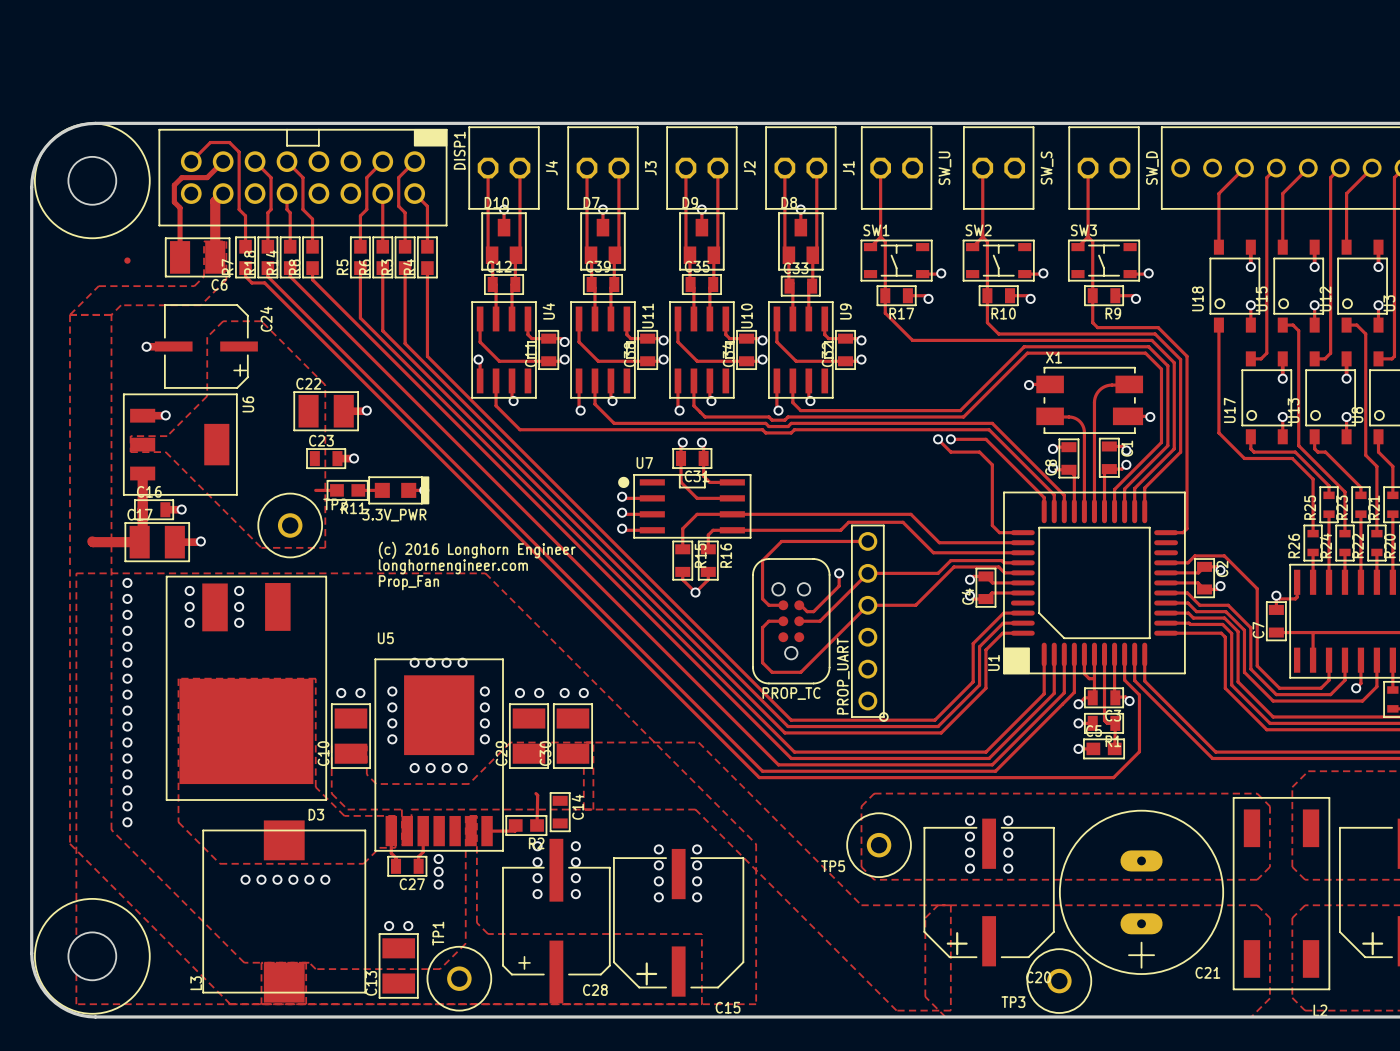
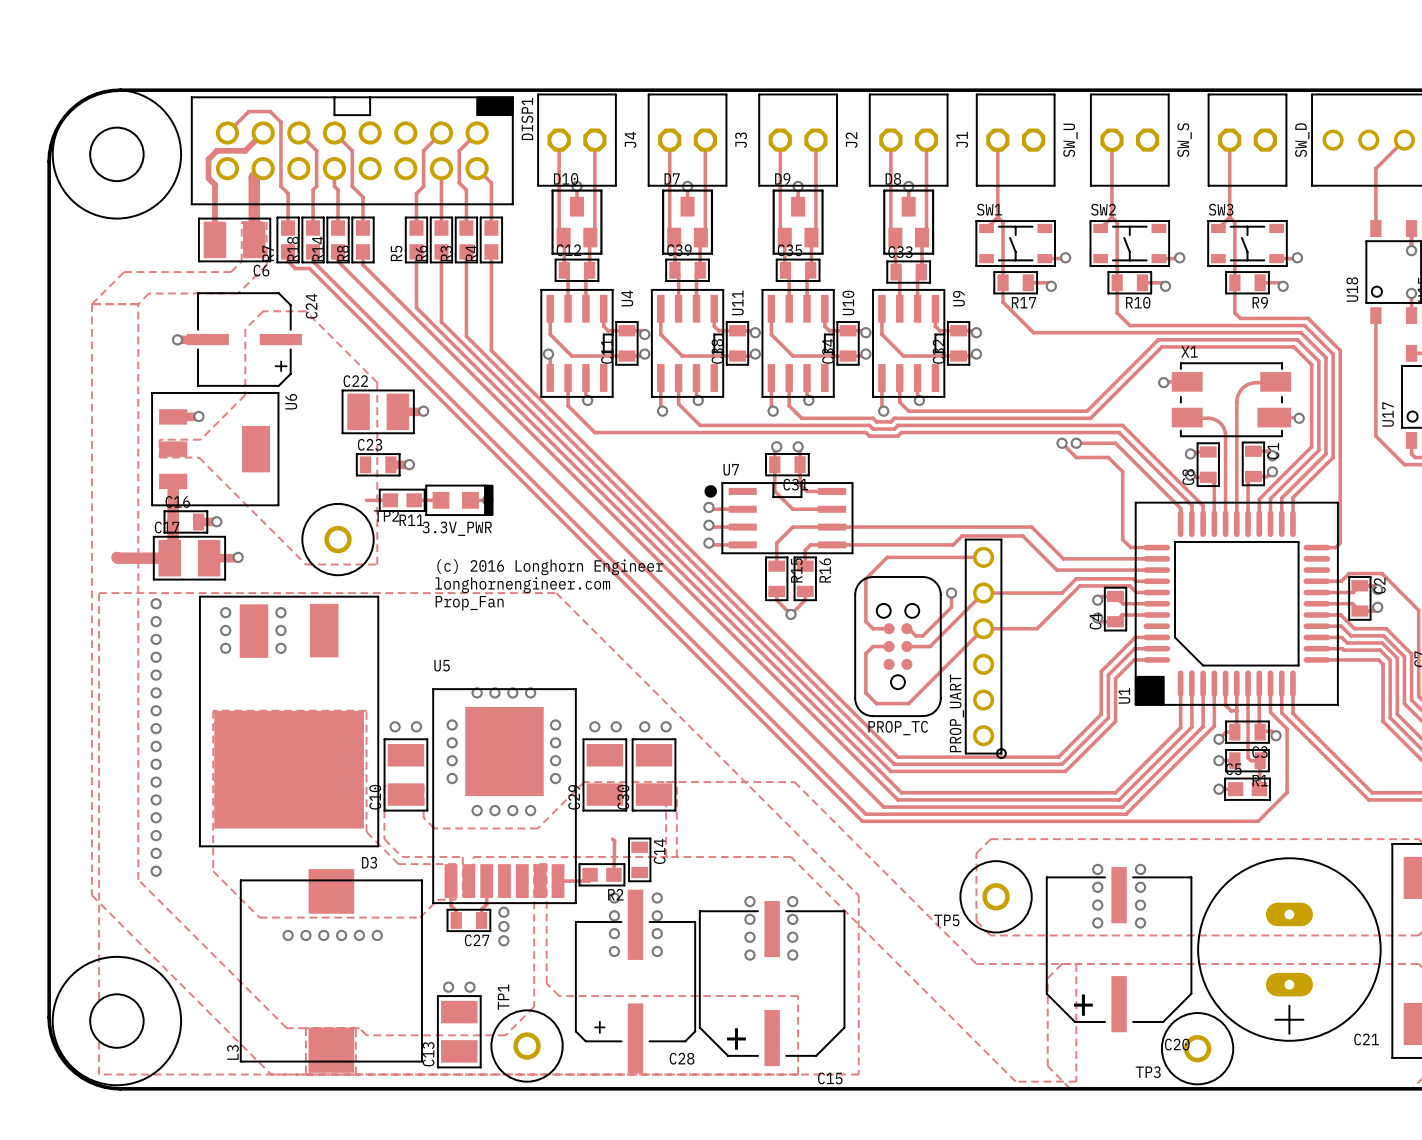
part: (127, 260) -> none

